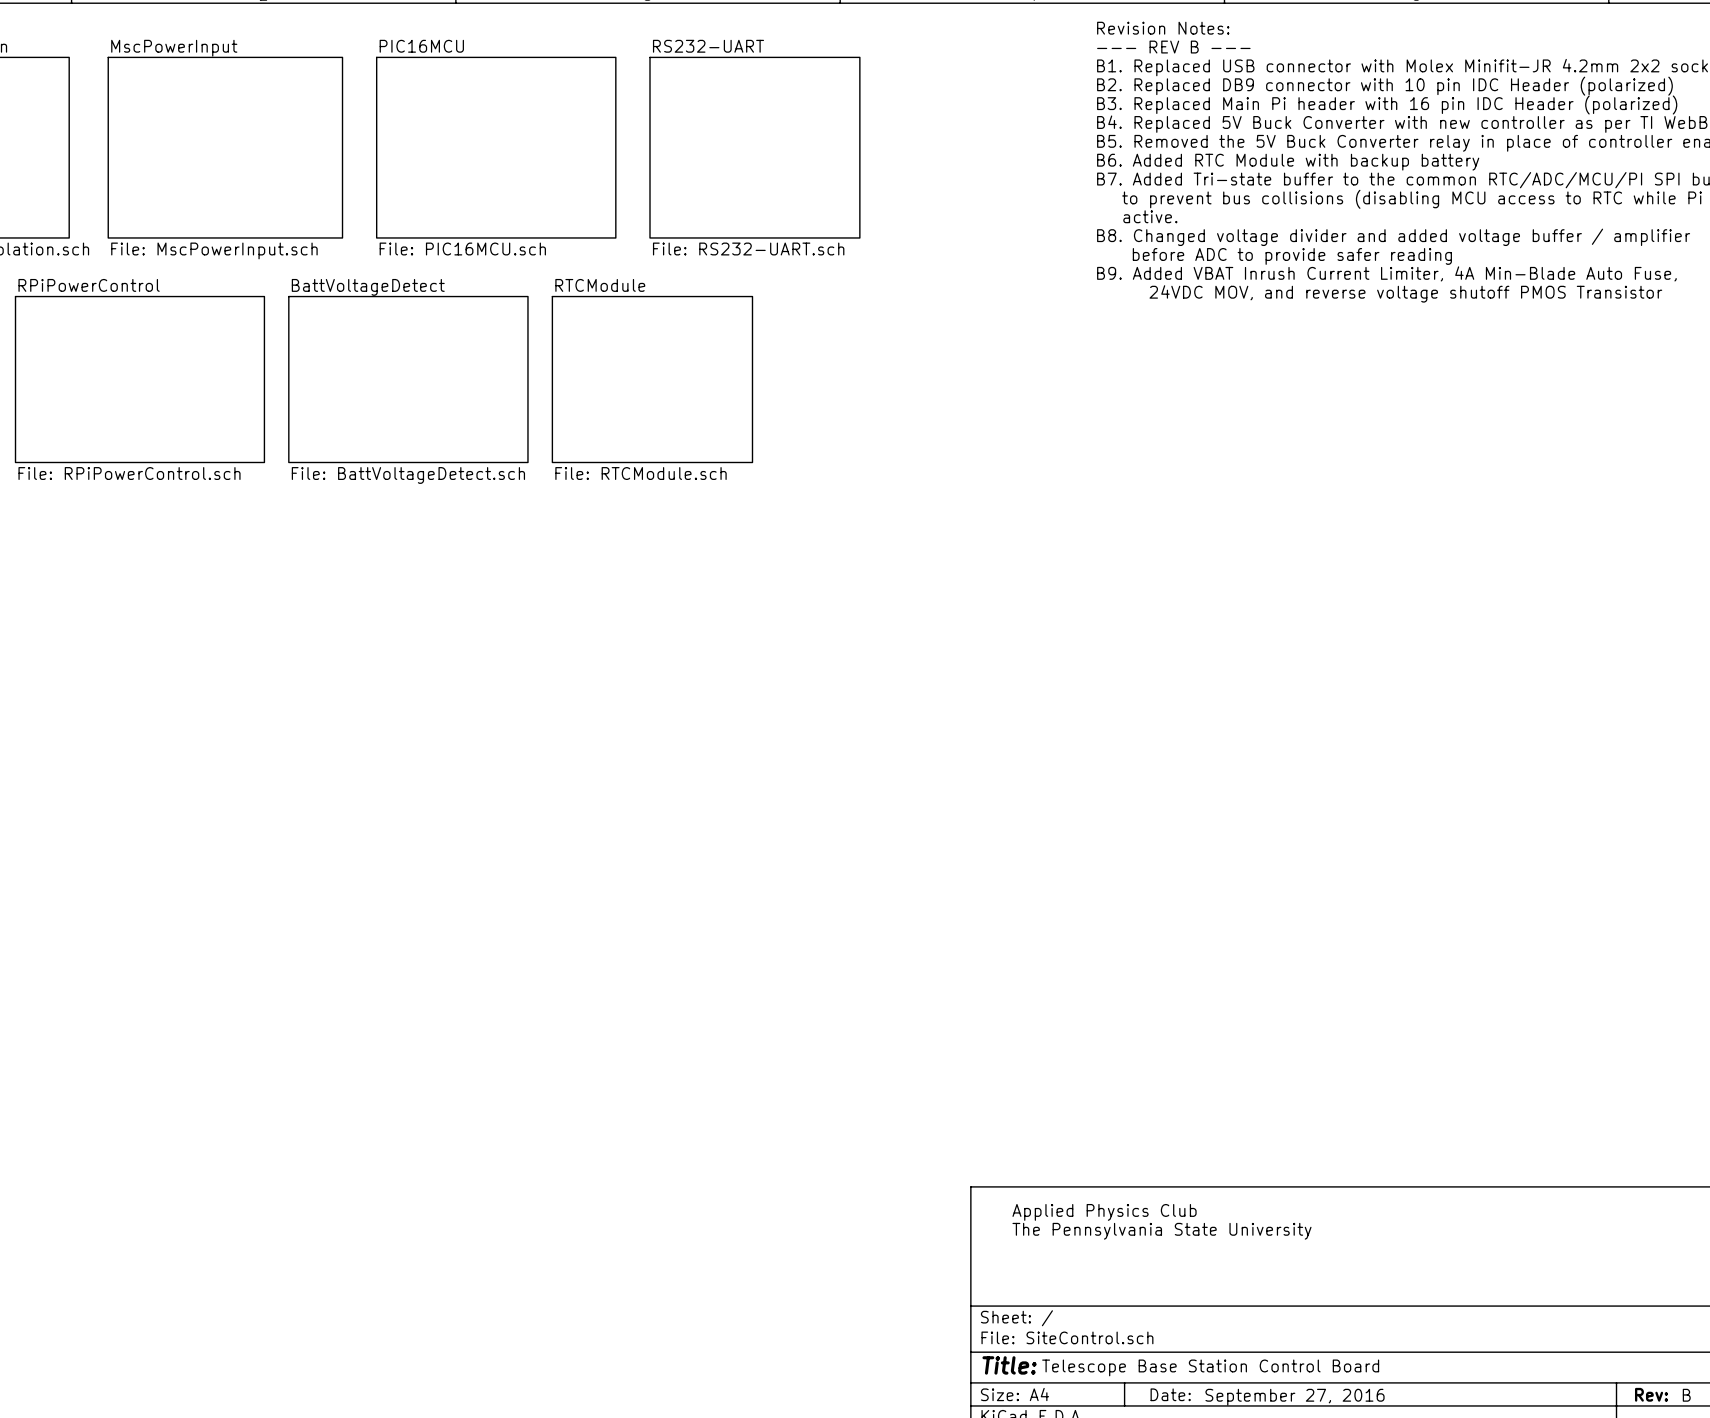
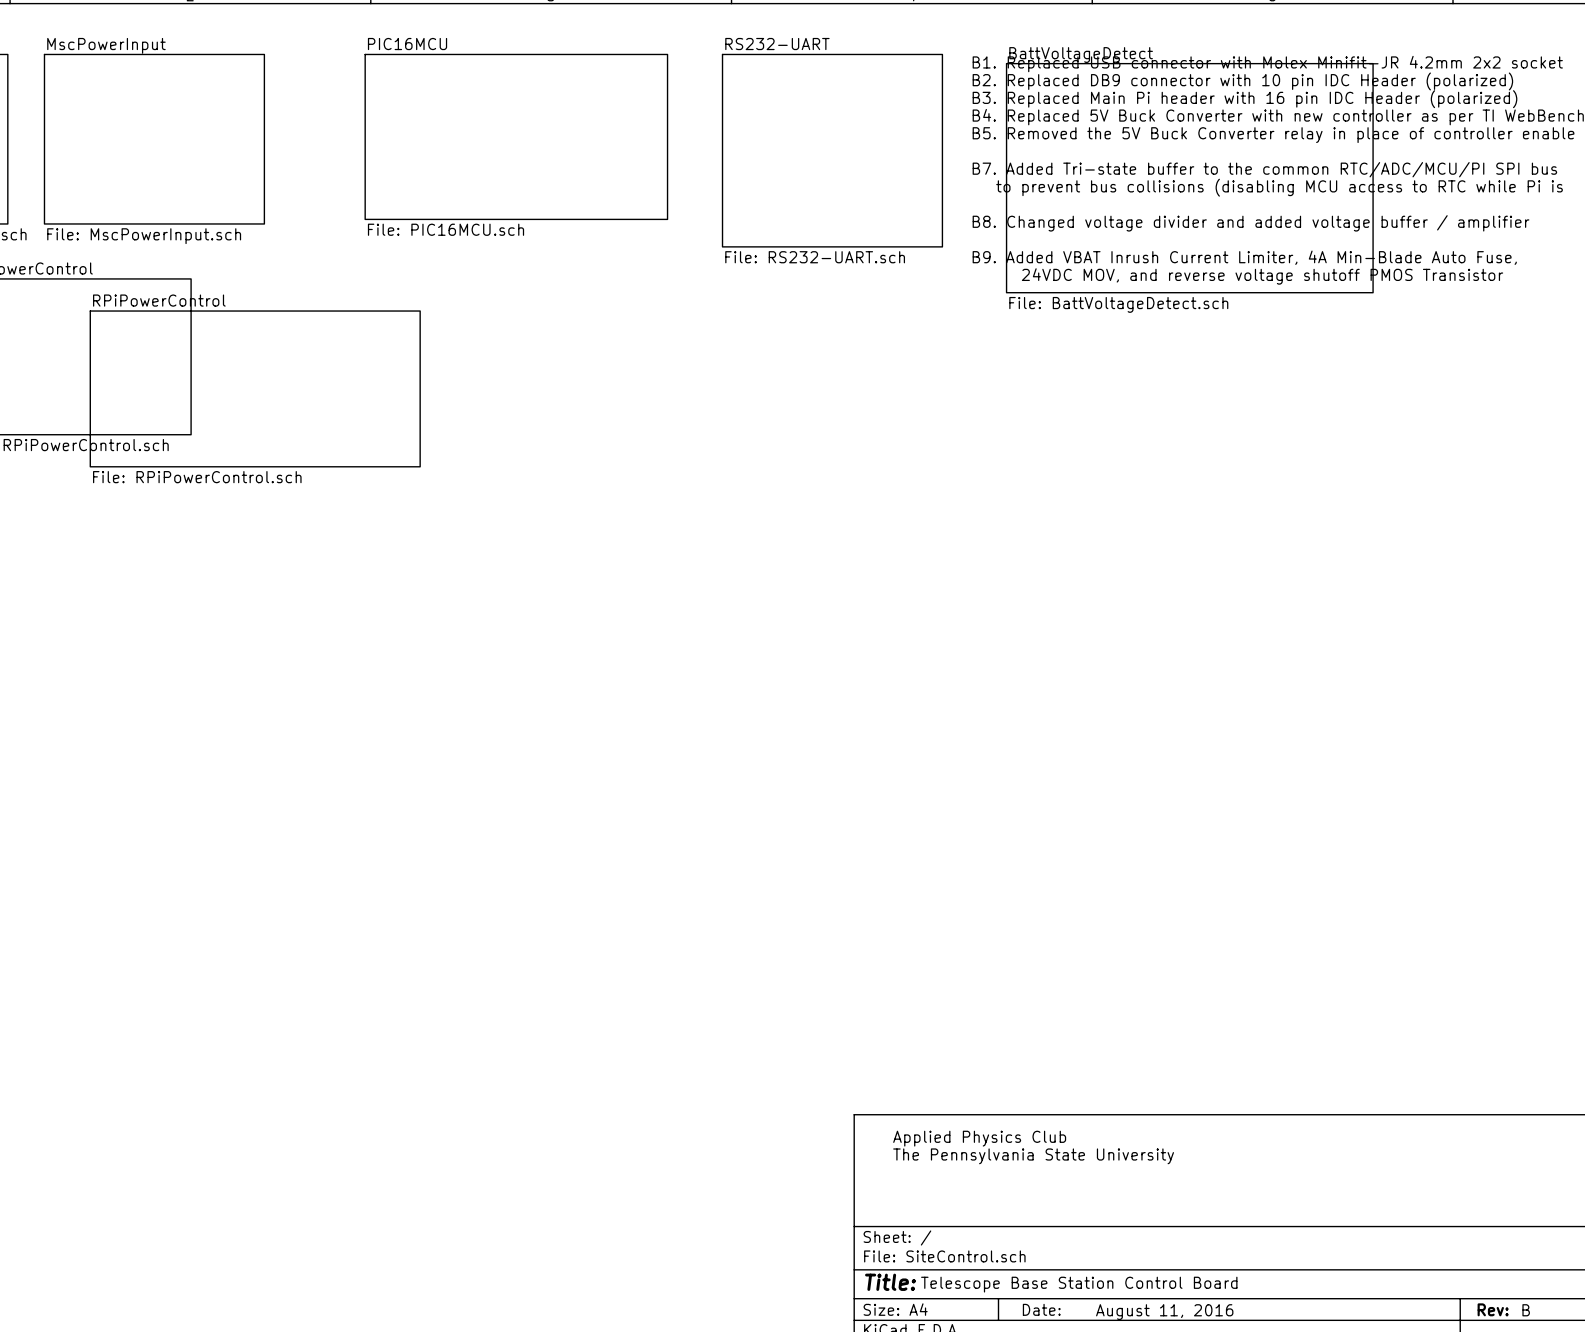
text: Revision Notes: (1163, 28) -> none
sheet PIC16MCU name position: PIC16MCU (421, 46) -> PIC16MCU (407, 44)
sheet RS232-UART name position: RS232-UART (708, 46) -> RS232-UART (777, 44)
text: --- REV B --- (1173, 47) -> none
sheet PIC16MCU shape: [376, 57, 616, 238] -> [365, 54, 668, 220]
sheet RS232-UART shape: [650, 57, 860, 238] -> [722, 54, 943, 247]
text: B6. Added RTC Module with backup battery (1288, 162) -> none
sheet BattVoltageDetect: none -> File: BattVoltageDetect.sch (1189, 178)
text: active. (1150, 216) -> none
sheet PIC16MCU value position: File: PIC16MCU.sch (462, 249) -> File: PIC16MCU.sch (446, 229)
sheet RS232-UART value position: File: RS232-UART.sch (748, 249) -> File: RS232-UART.sch (815, 257)
text: before ADC to provide safer reading (1292, 256) -> none
sheet BattVoltageDetect: File: BattVoltageDetect.sch (408, 379) -> none
sheet RTCModule: File: RTCModule.sch (652, 379) -> none
sheet RPiPowerControl: none -> File: RPiPowerControl.sch (255, 388)
text: September 27, 2016 (1295, 1397) -> none
text: none -> August 11, 2016 (1164, 1312)

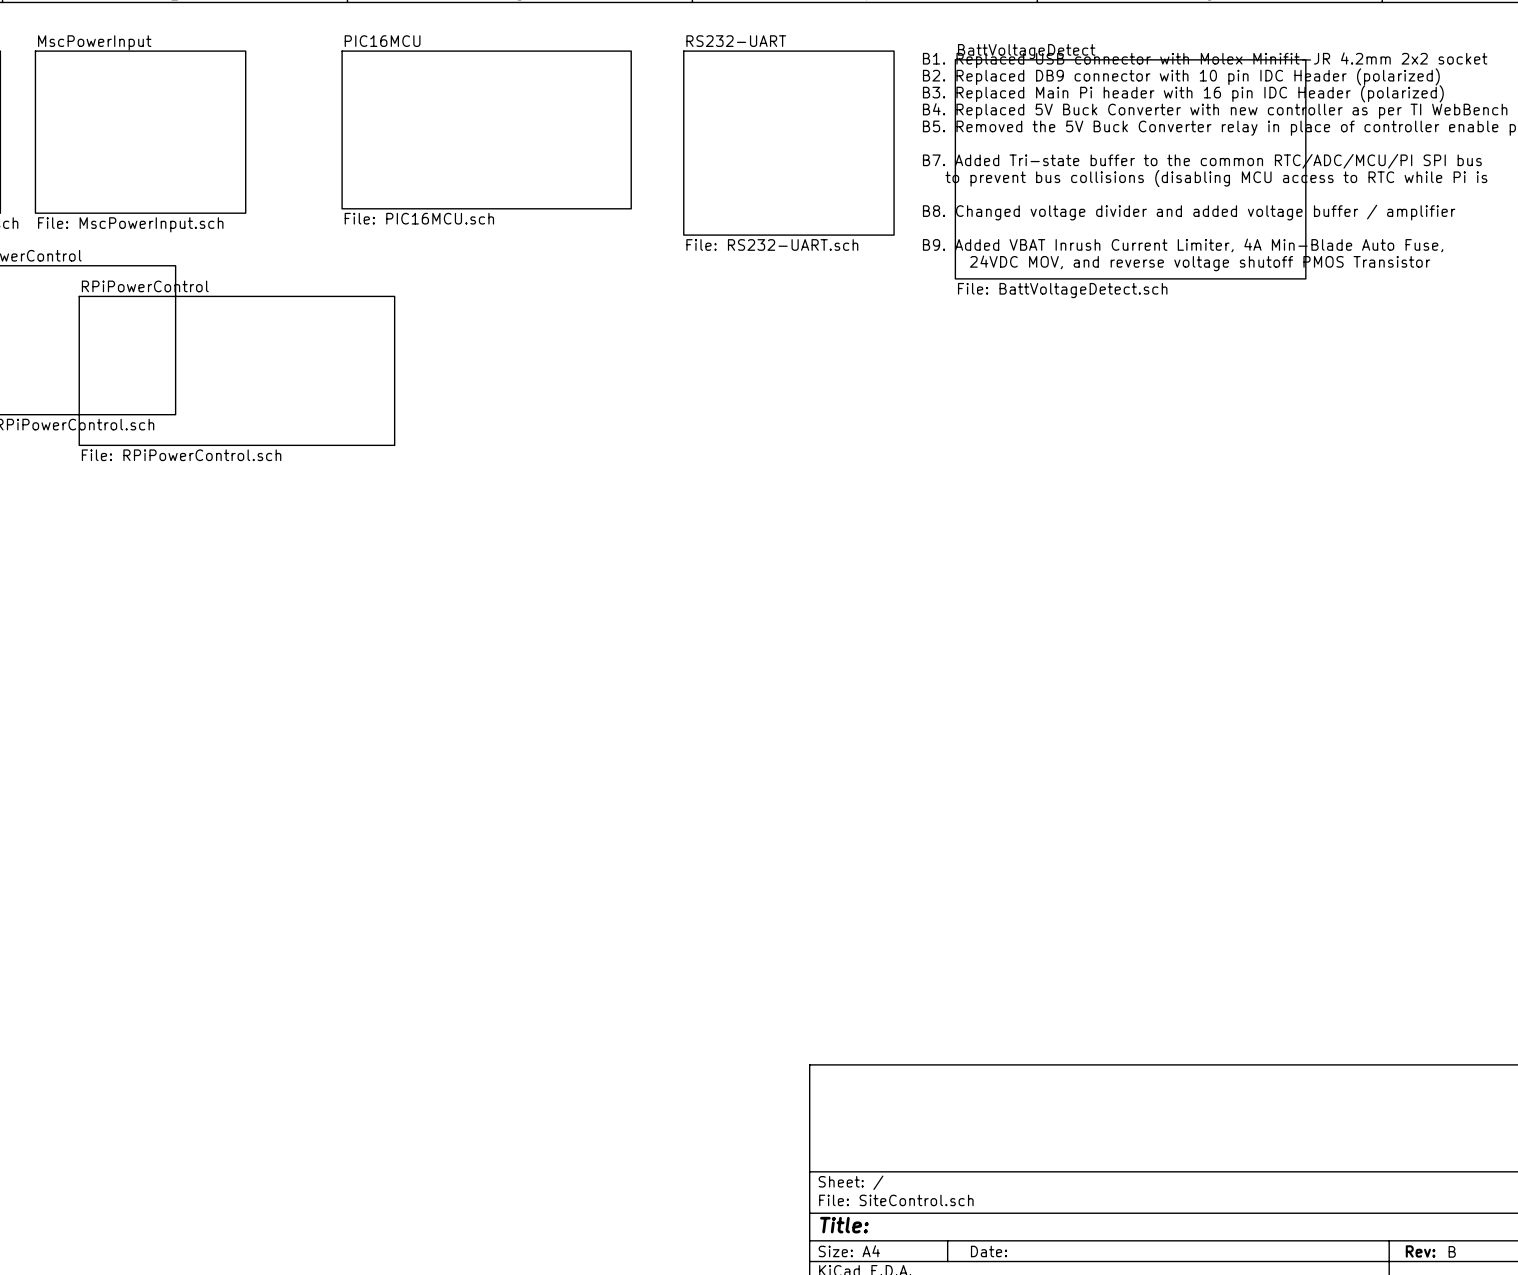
text: Applied Physics Club (979, 1138) -> none
text: The Pennsylvania State University (1033, 1156) -> none
text: Telescope Base Station Control Board (1079, 1284) -> none
text: August 11, 2016 (1164, 1312) -> none

